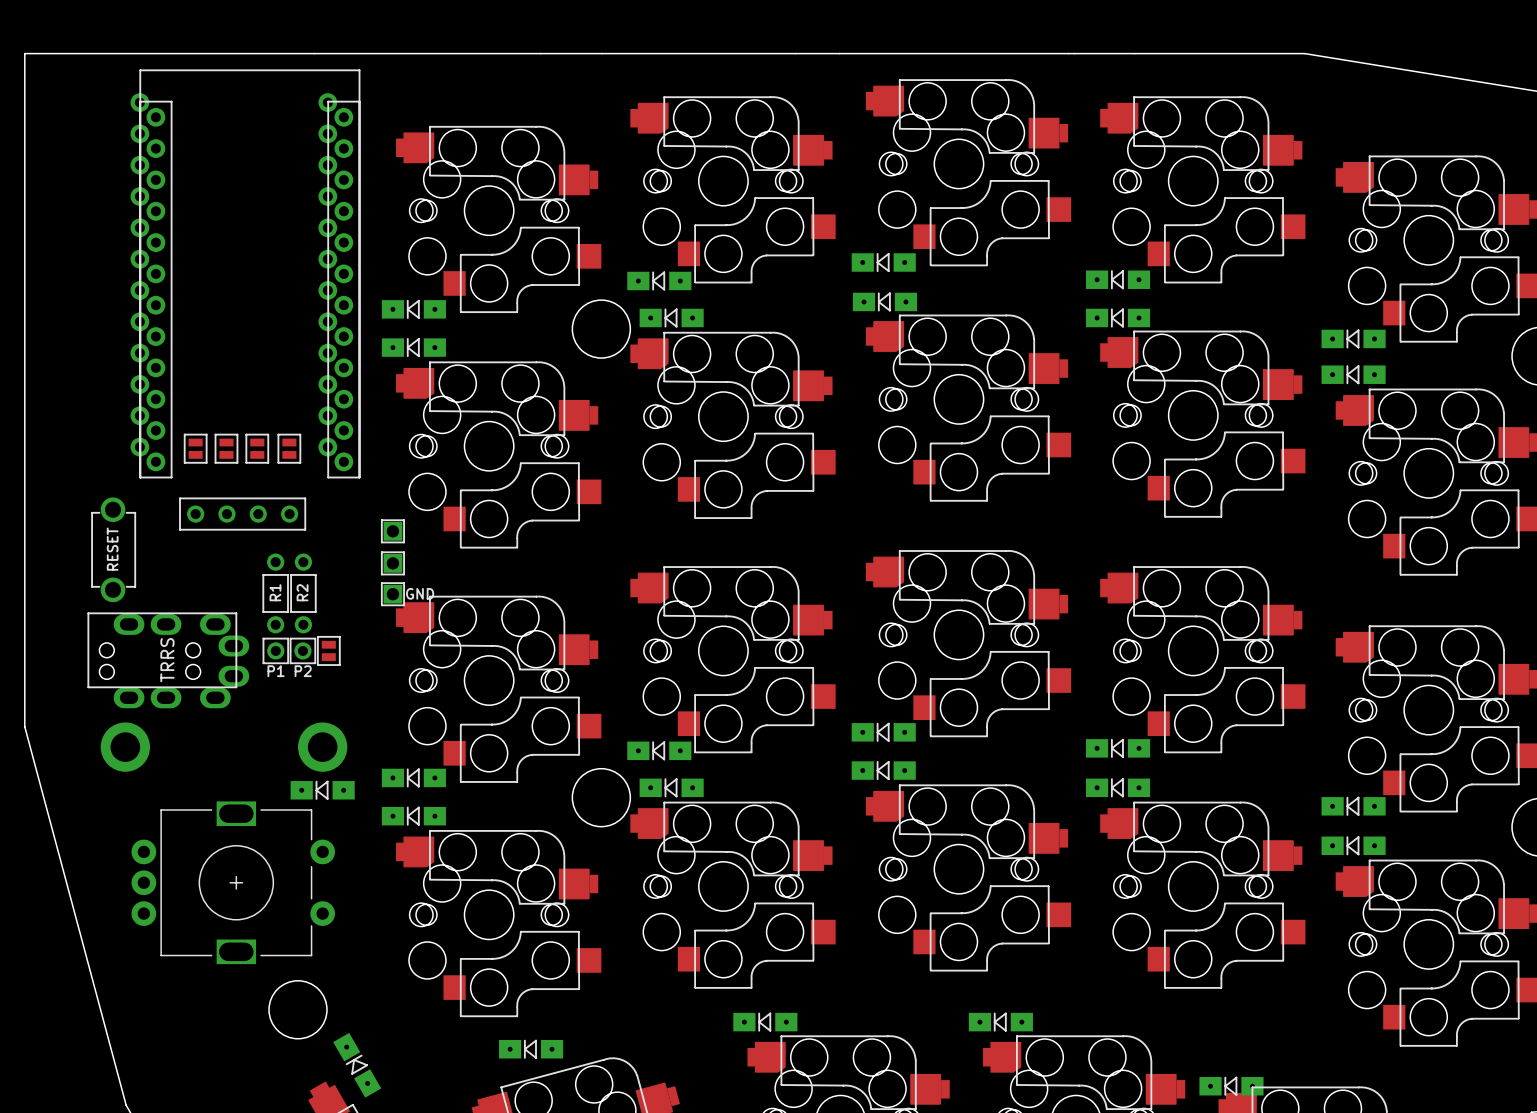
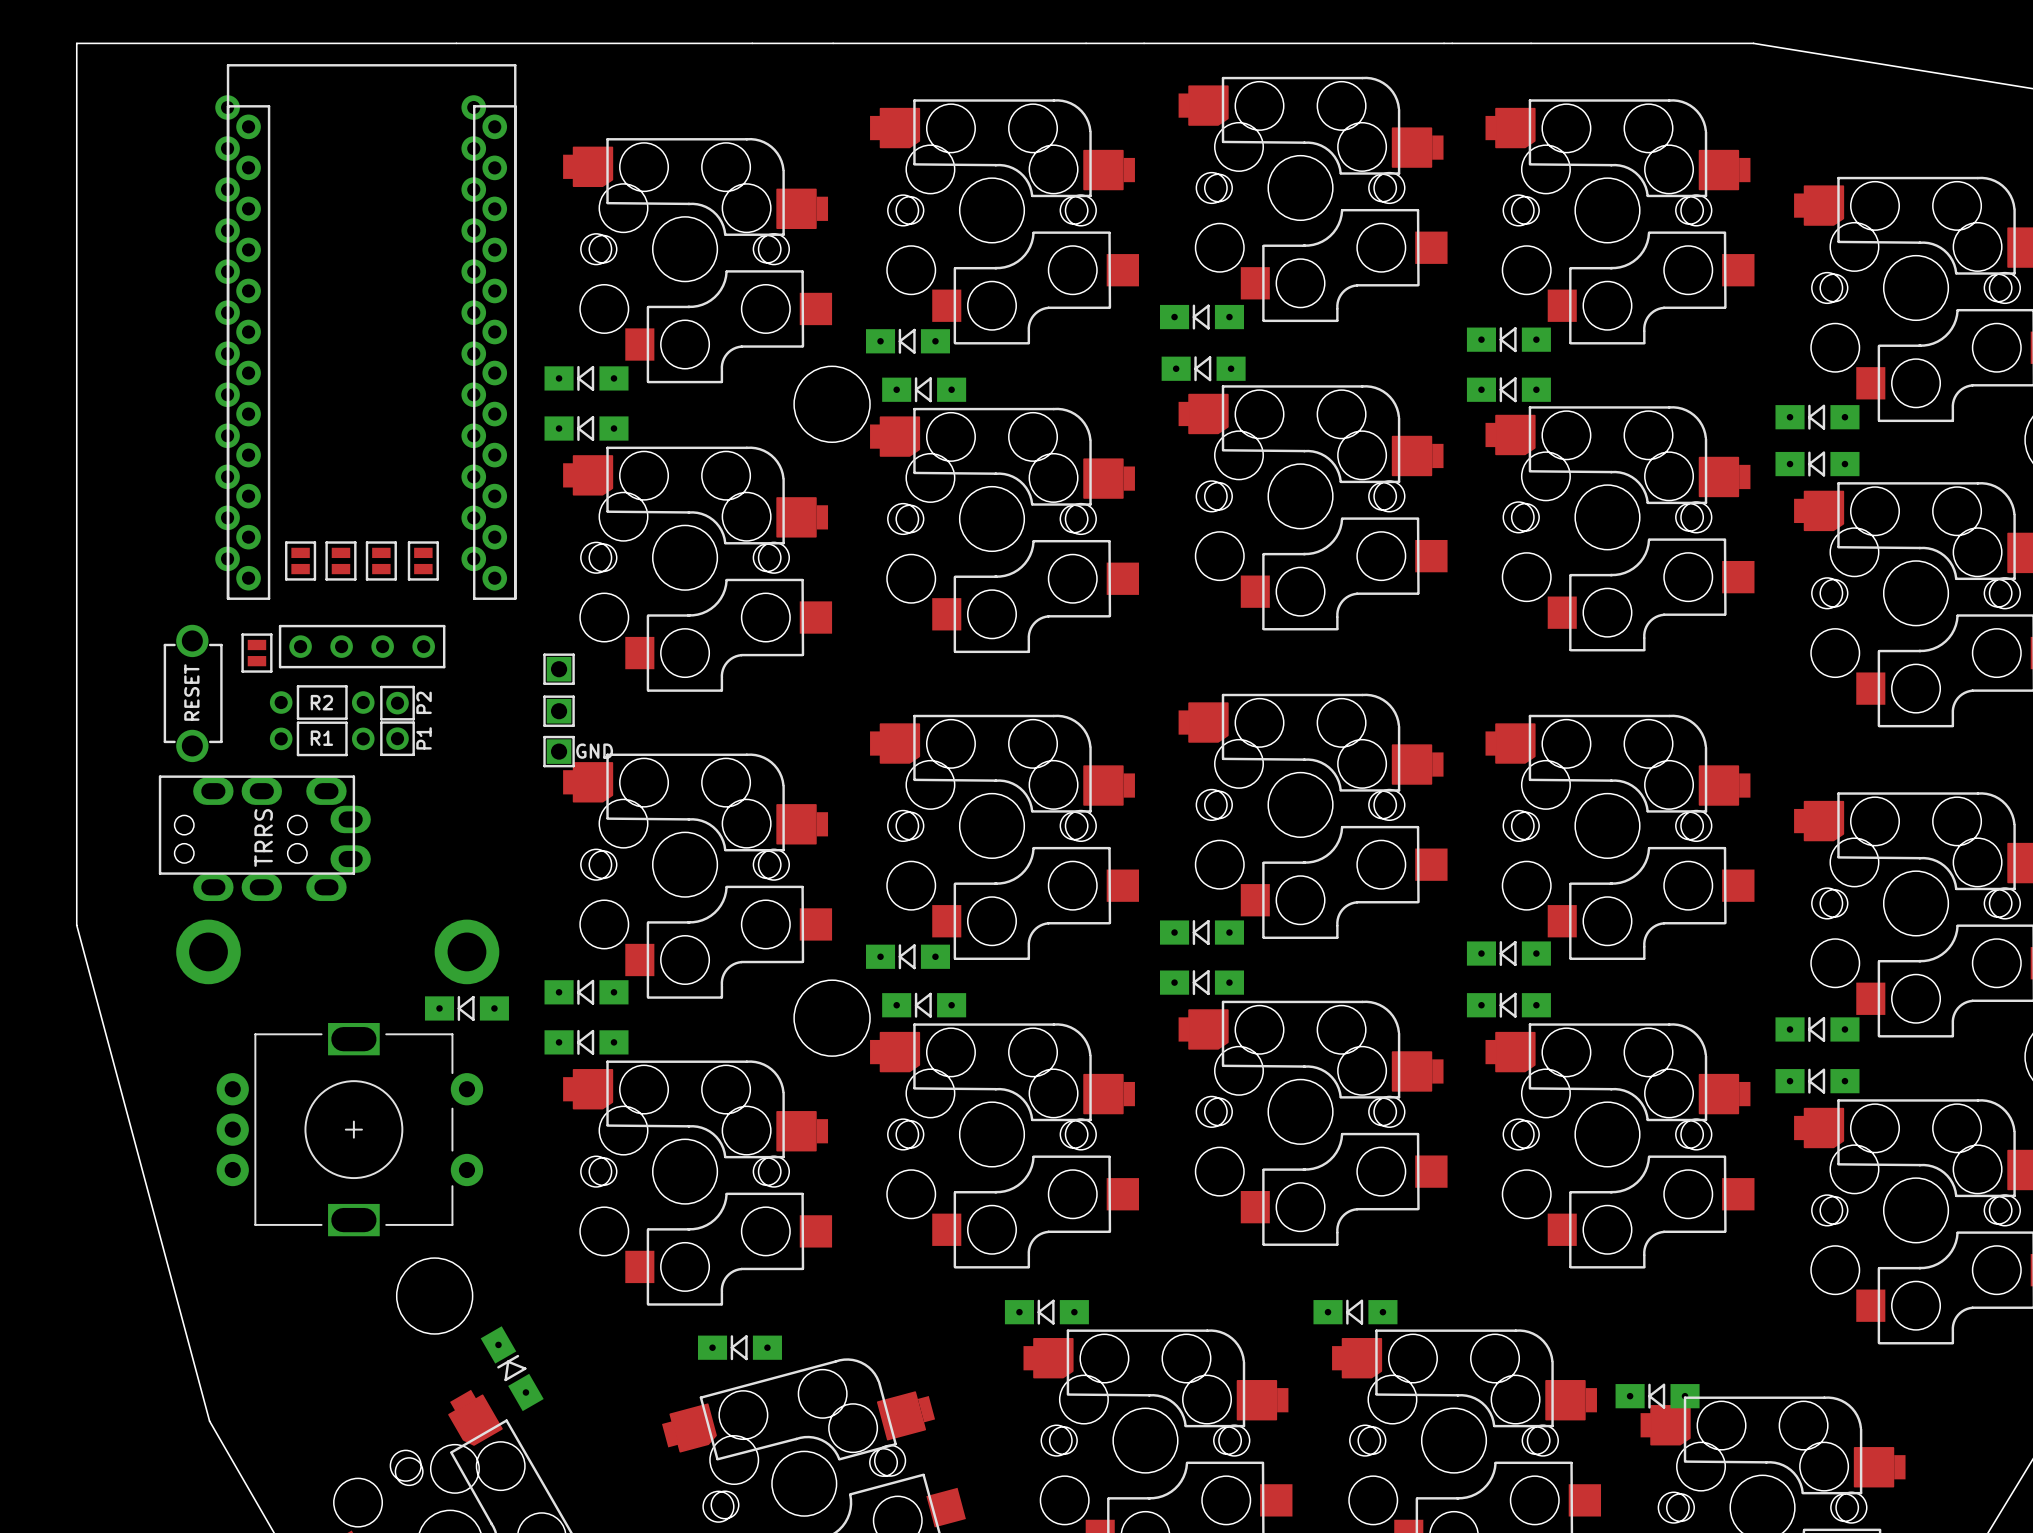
R1 rotation: 0° (275, 593) -> 90° clockwise (322, 738)
R1 position: (275, 593) -> (322, 738)
R2 rotation: 0° (303, 593) -> 90° clockwise (322, 702)
R2 position: (303, 593) -> (322, 702)
P1 position: (275, 650) -> (397, 738)
P2 position: (302, 650) -> (397, 703)
part position: (328, 650) -> (256, 653)
P1 name rotation: 0° (276, 671) -> 90° counterclockwise (424, 738)
P1 name position: P1 (276, 671) -> P1 (424, 738)
P2 name rotation: 0° (303, 671) -> 90° counterclockwise (424, 702)
P2 name position: P2 (303, 671) -> P2 (424, 702)

